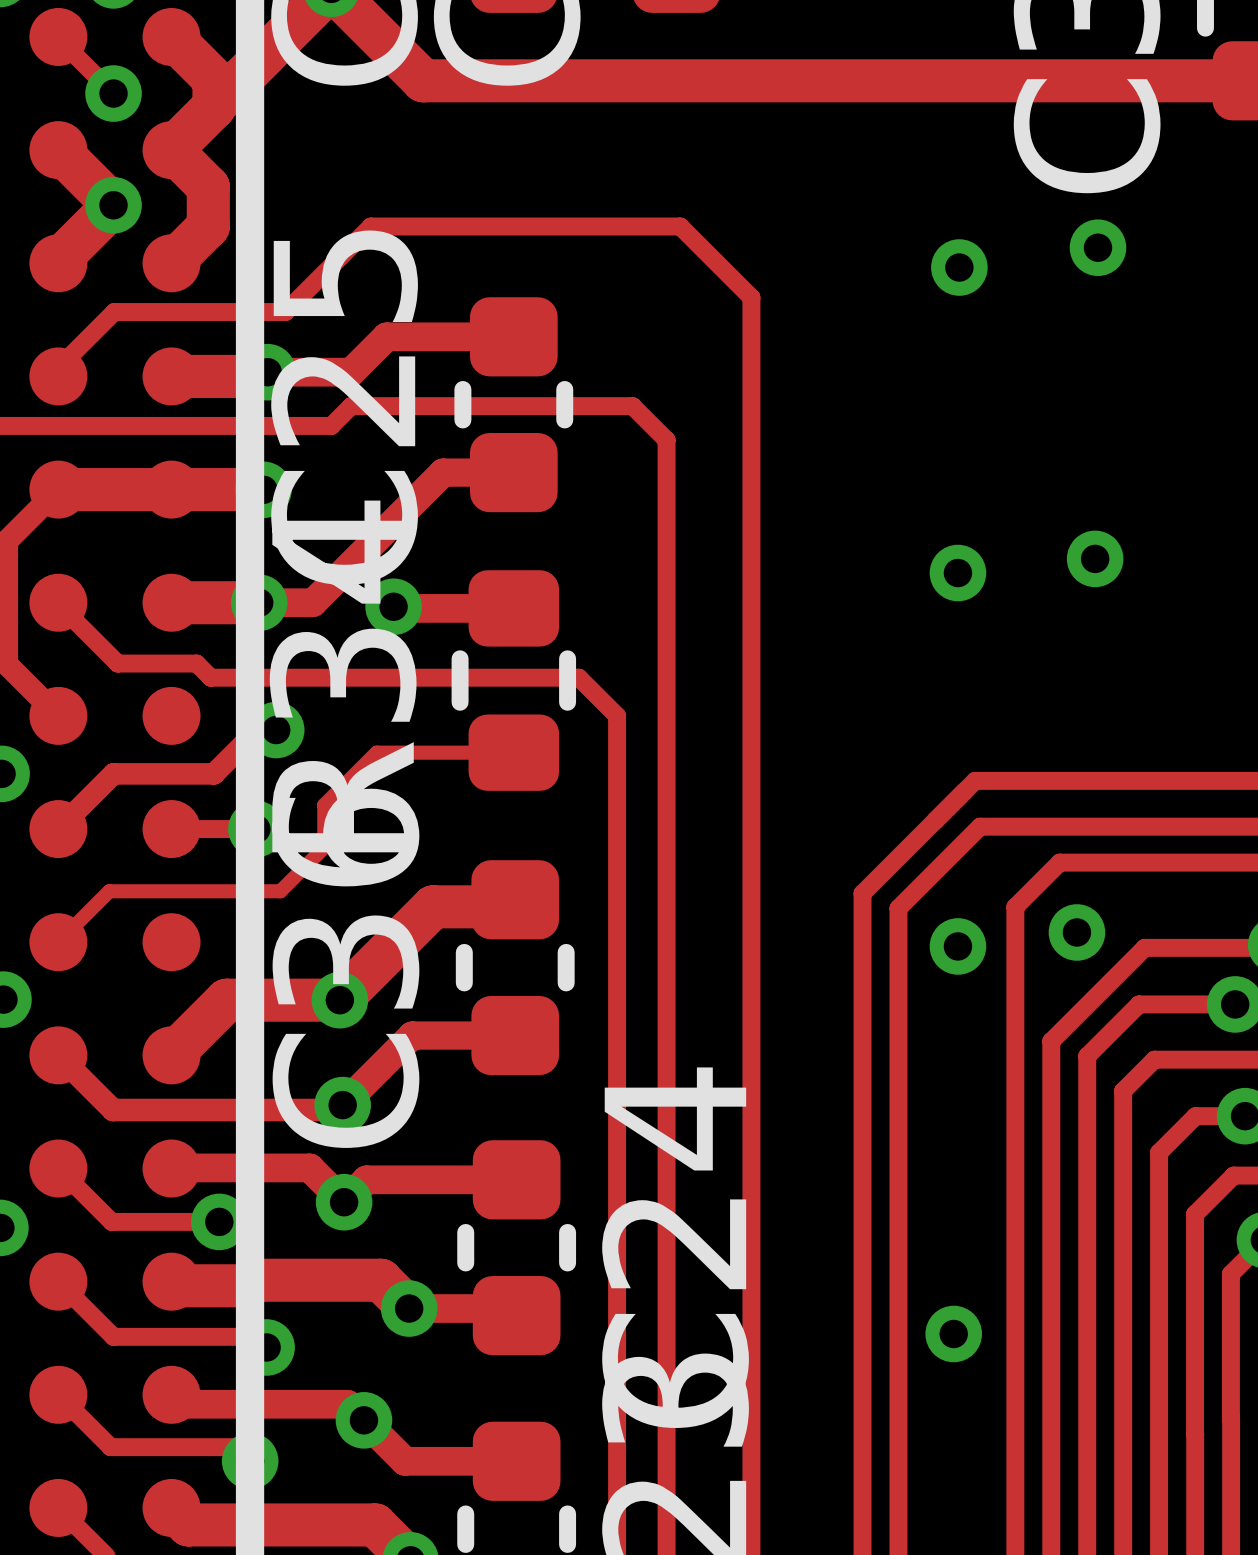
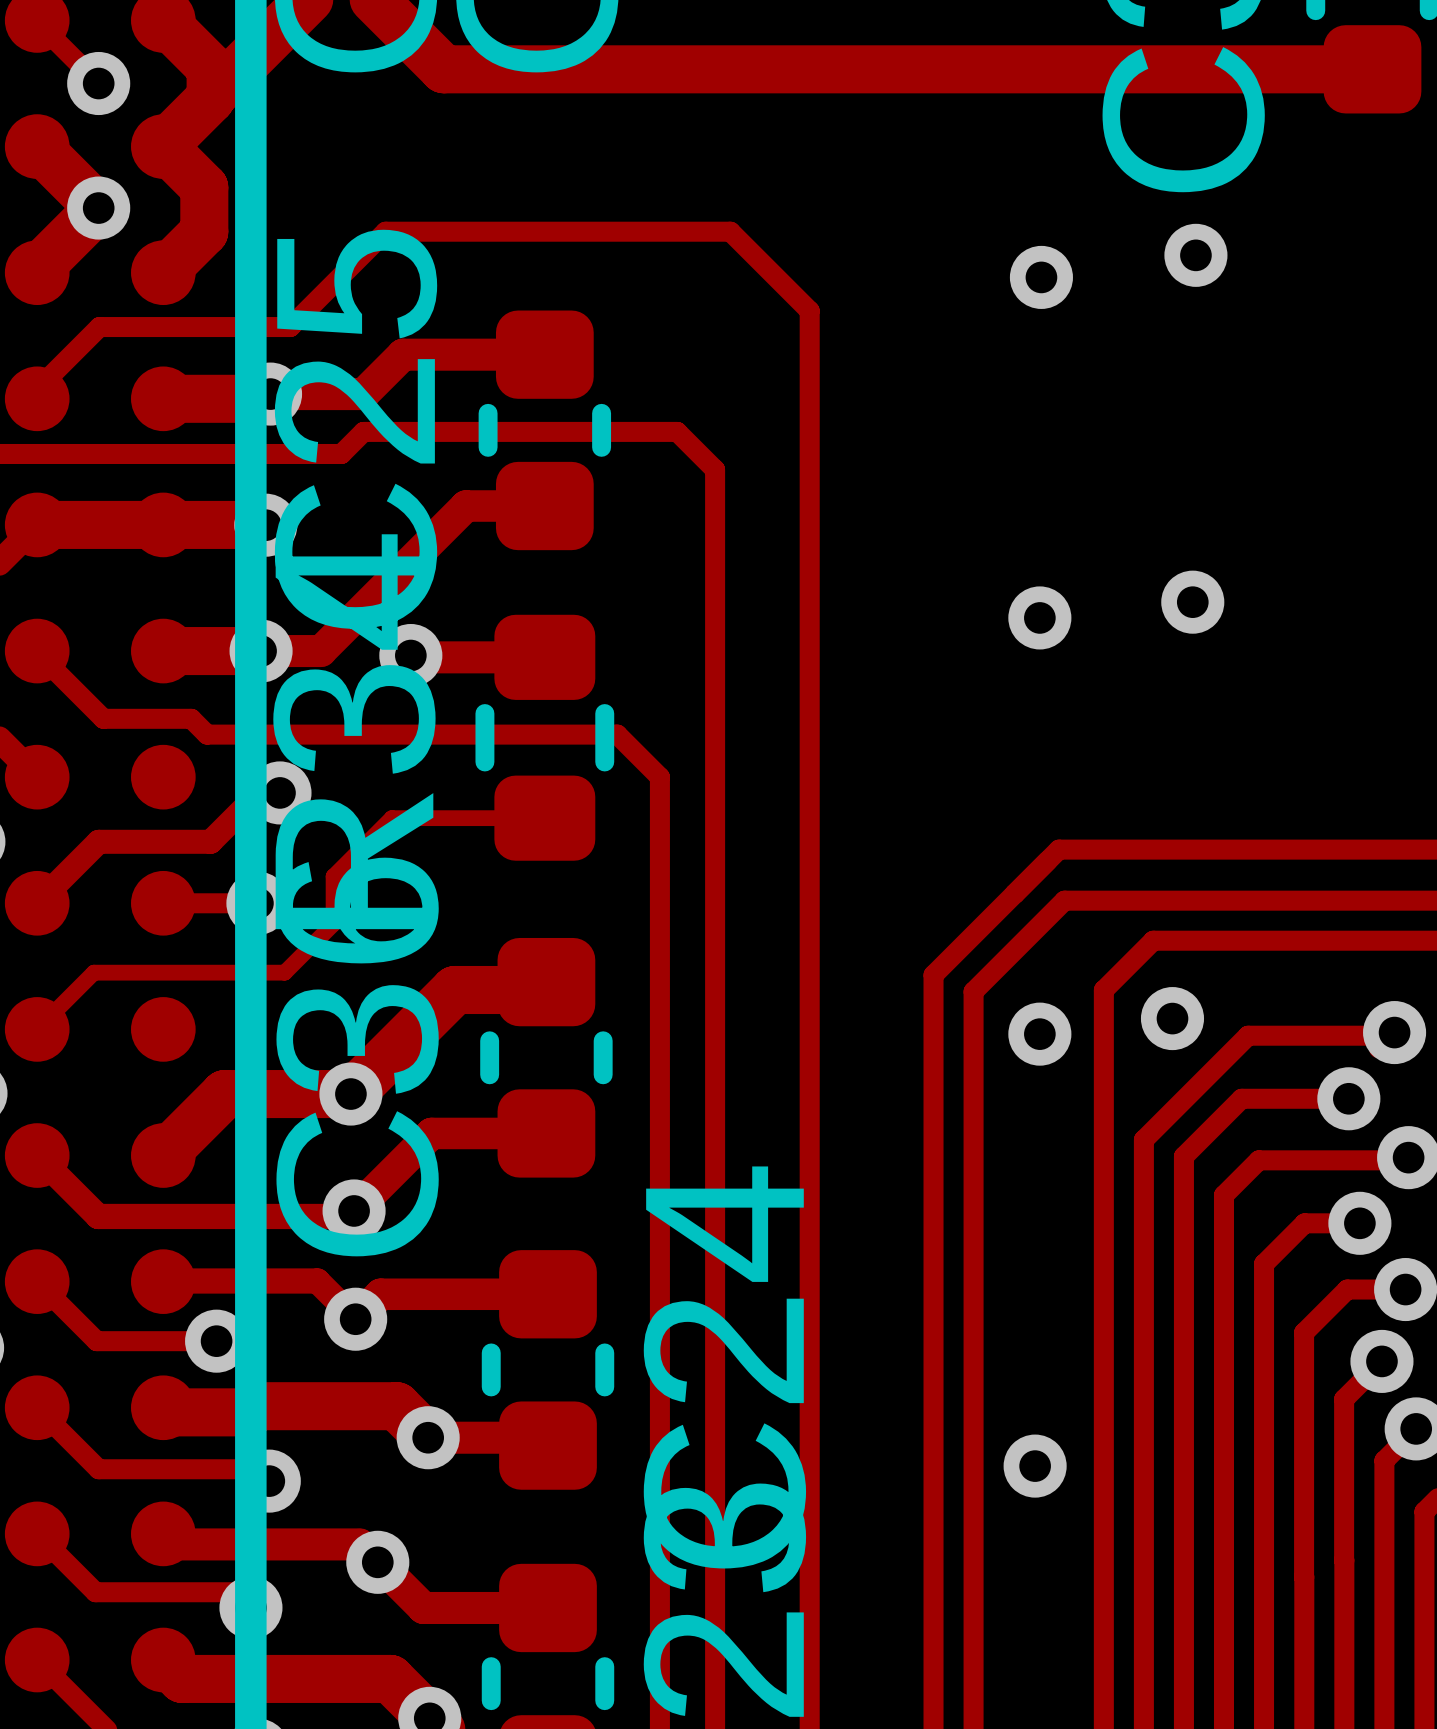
track width: thick (172, 1167) (309, 1167) (344, 1202) (366, 1179) (516, 1179) -> thin (163, 1281) (317, 1281) (355, 1319) (380, 1294) (547, 1294)

